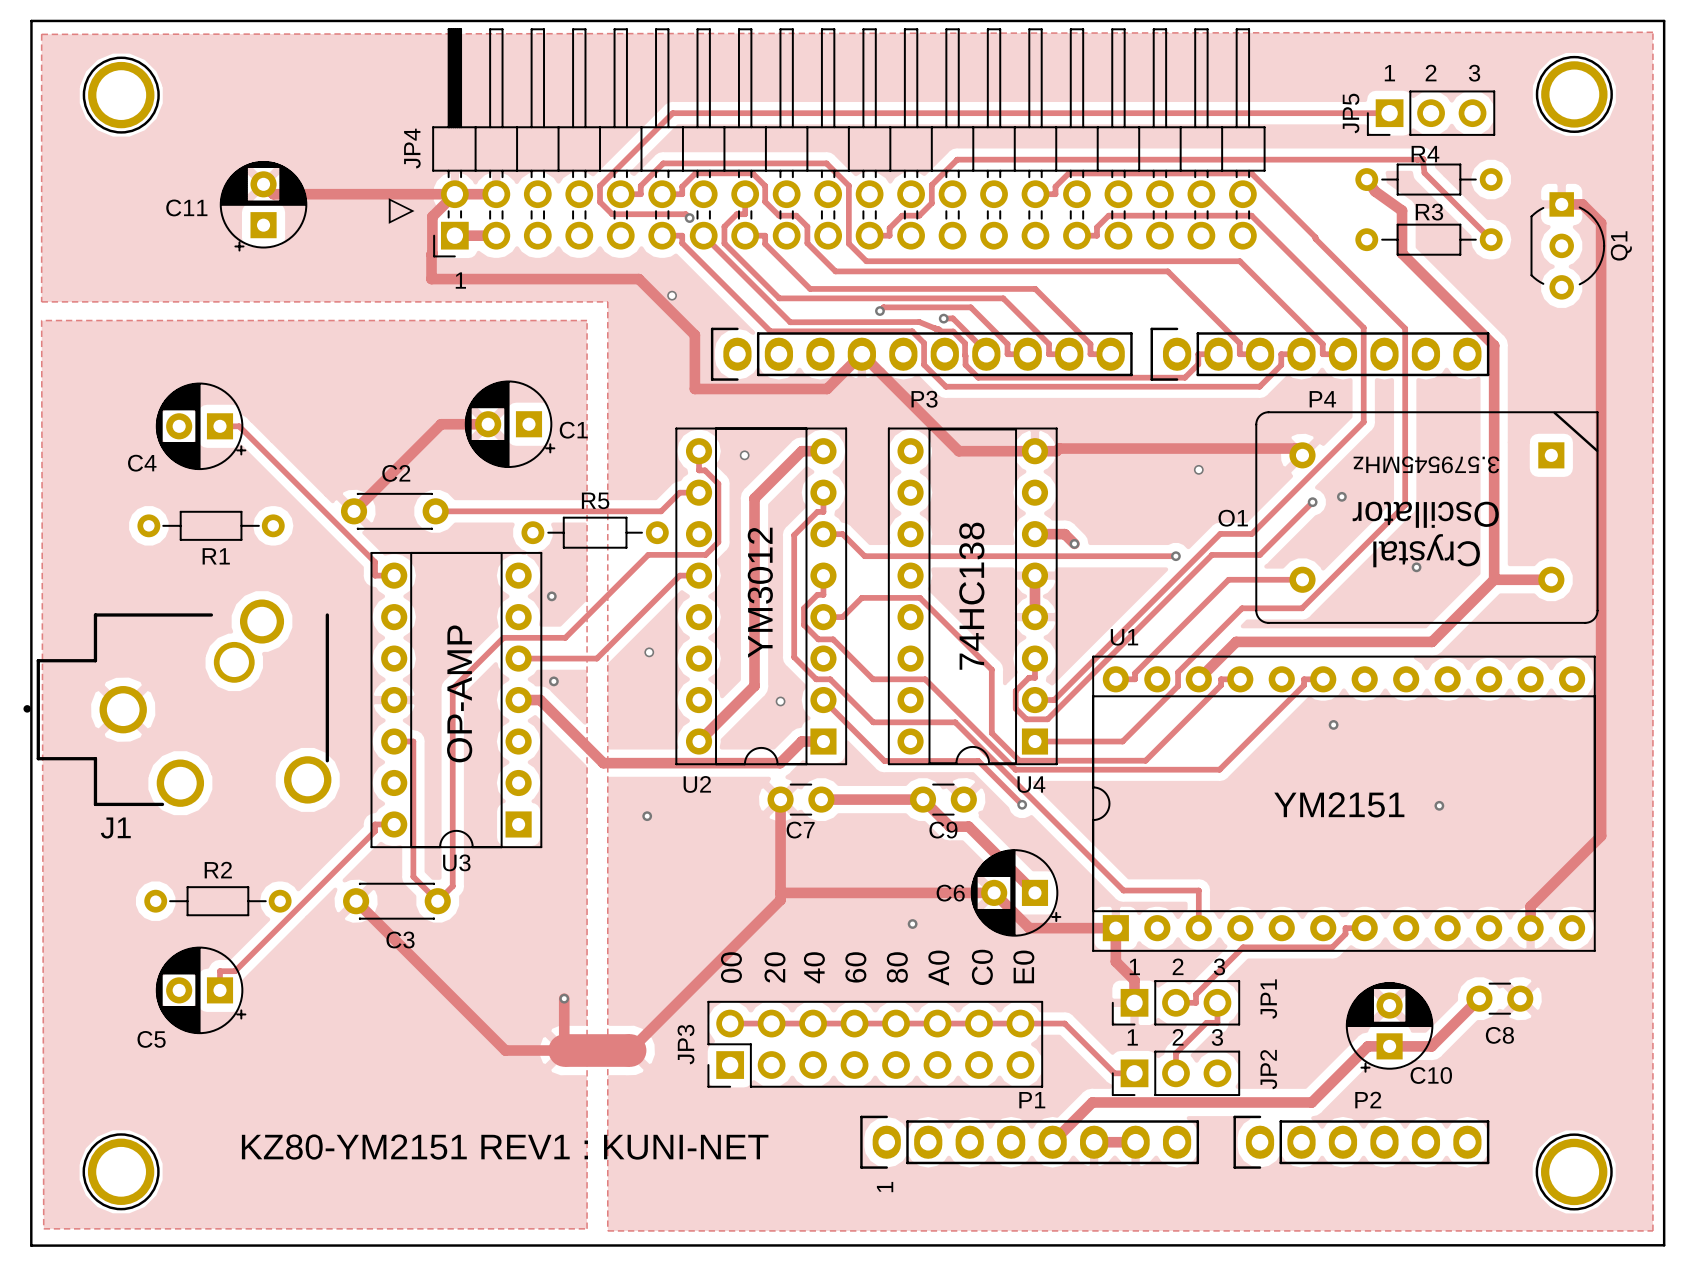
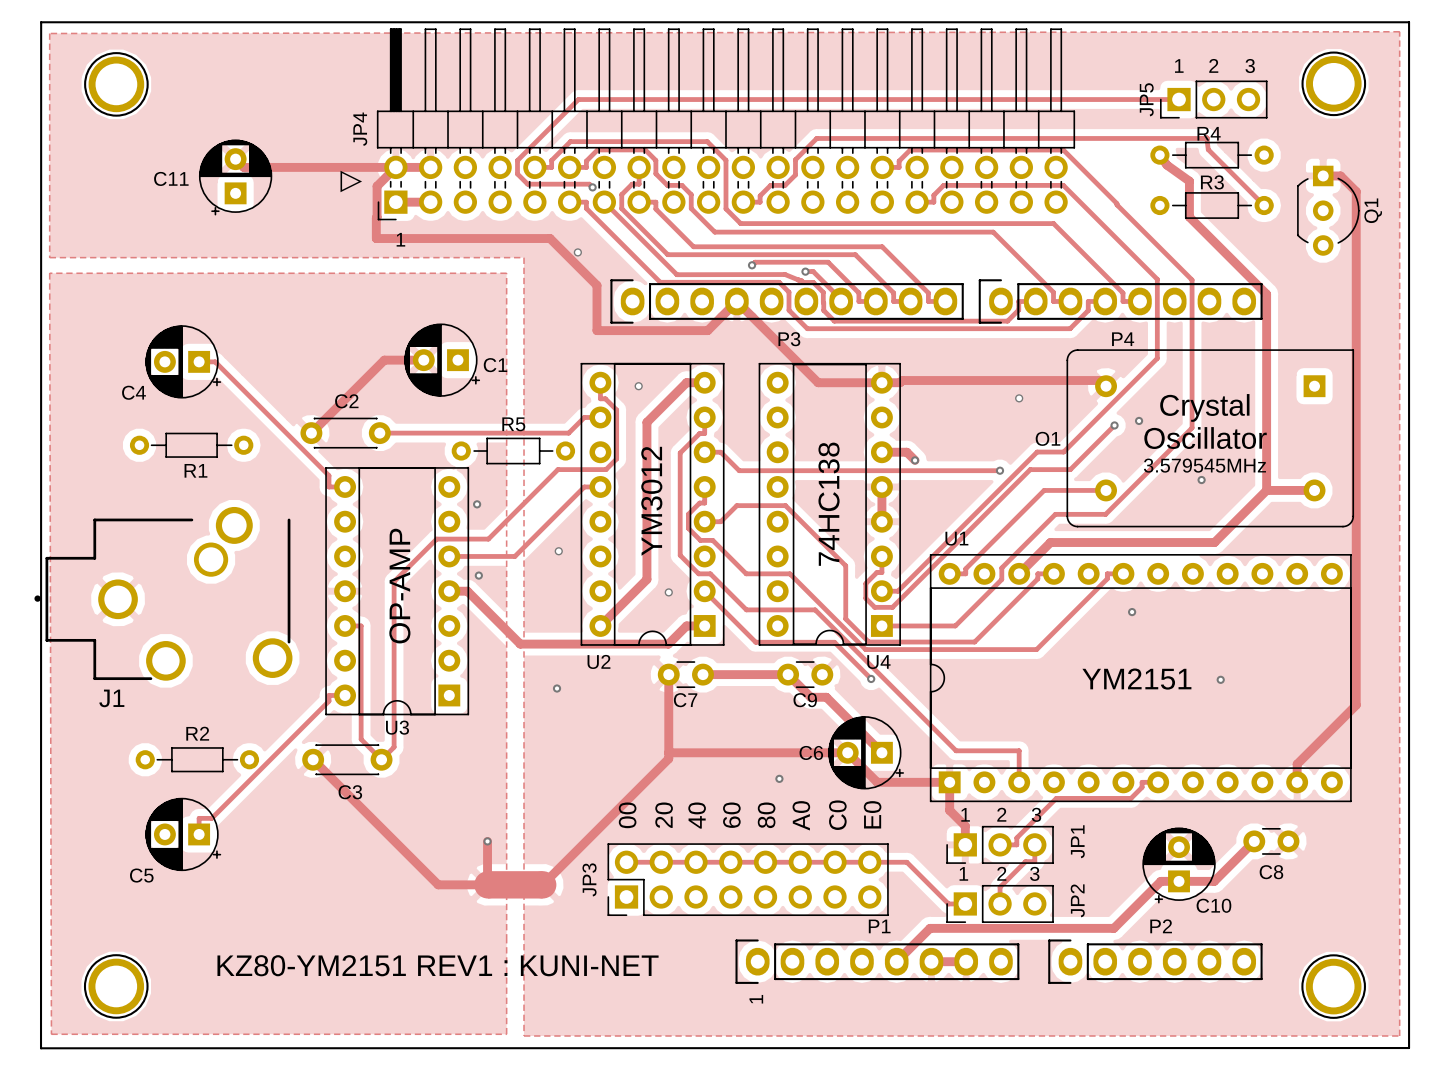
line: (1554, 412) (1597, 450) -> none
text rotation: 0° (1426, 464) -> 180° (1204, 465)
text rotation: 0° (1425, 514) -> 180° (1205, 438)
text rotation: 0° (1426, 550) -> 180° (1204, 407)

